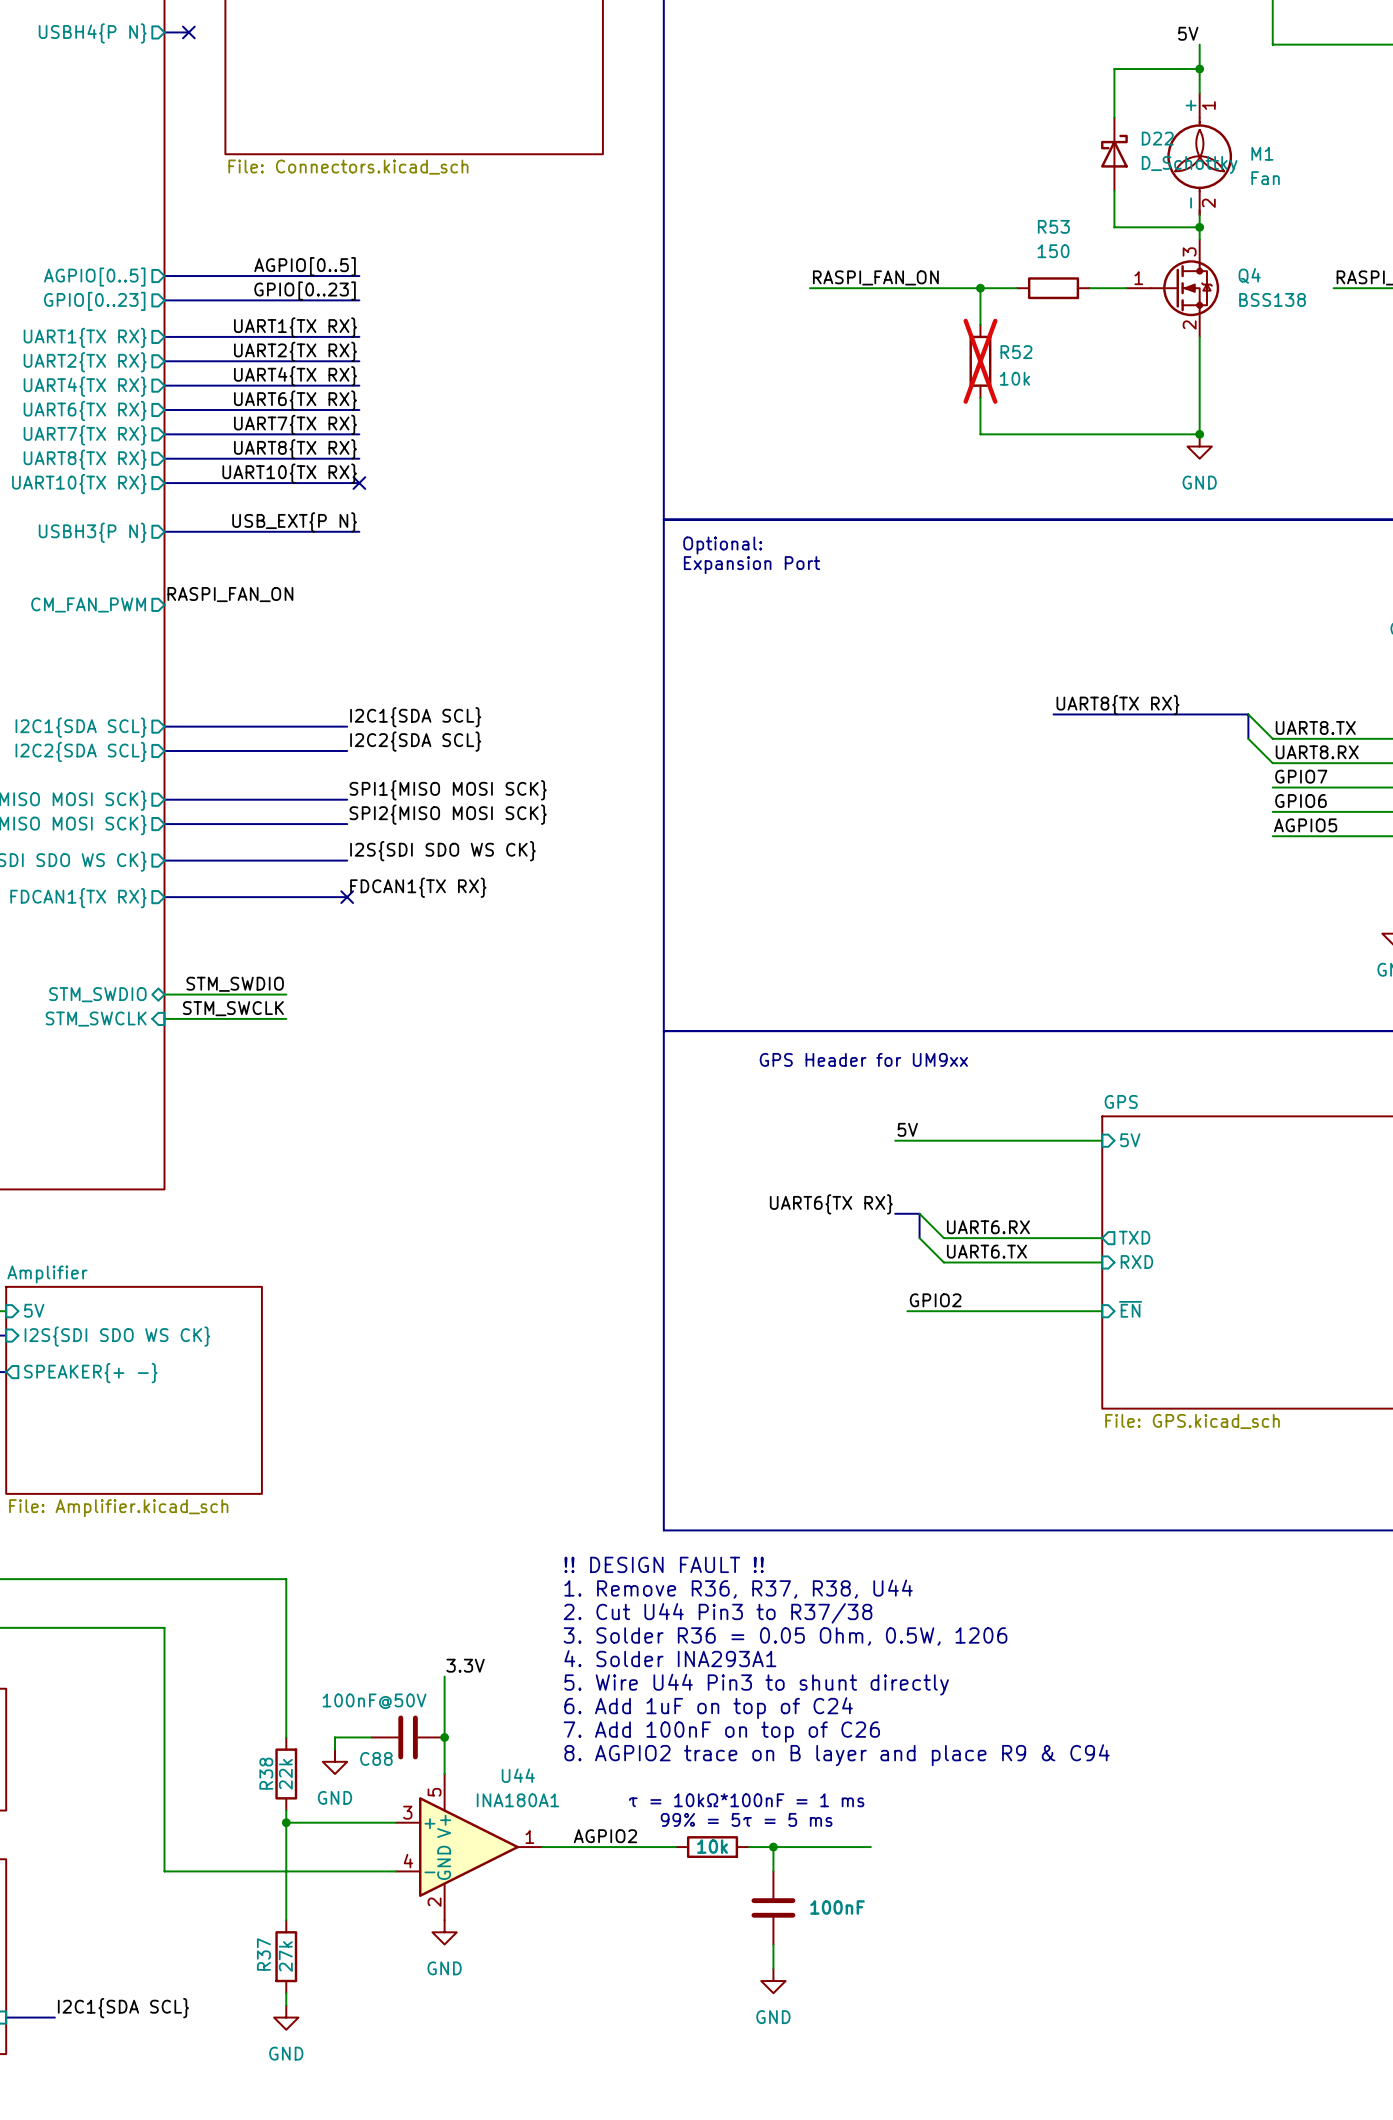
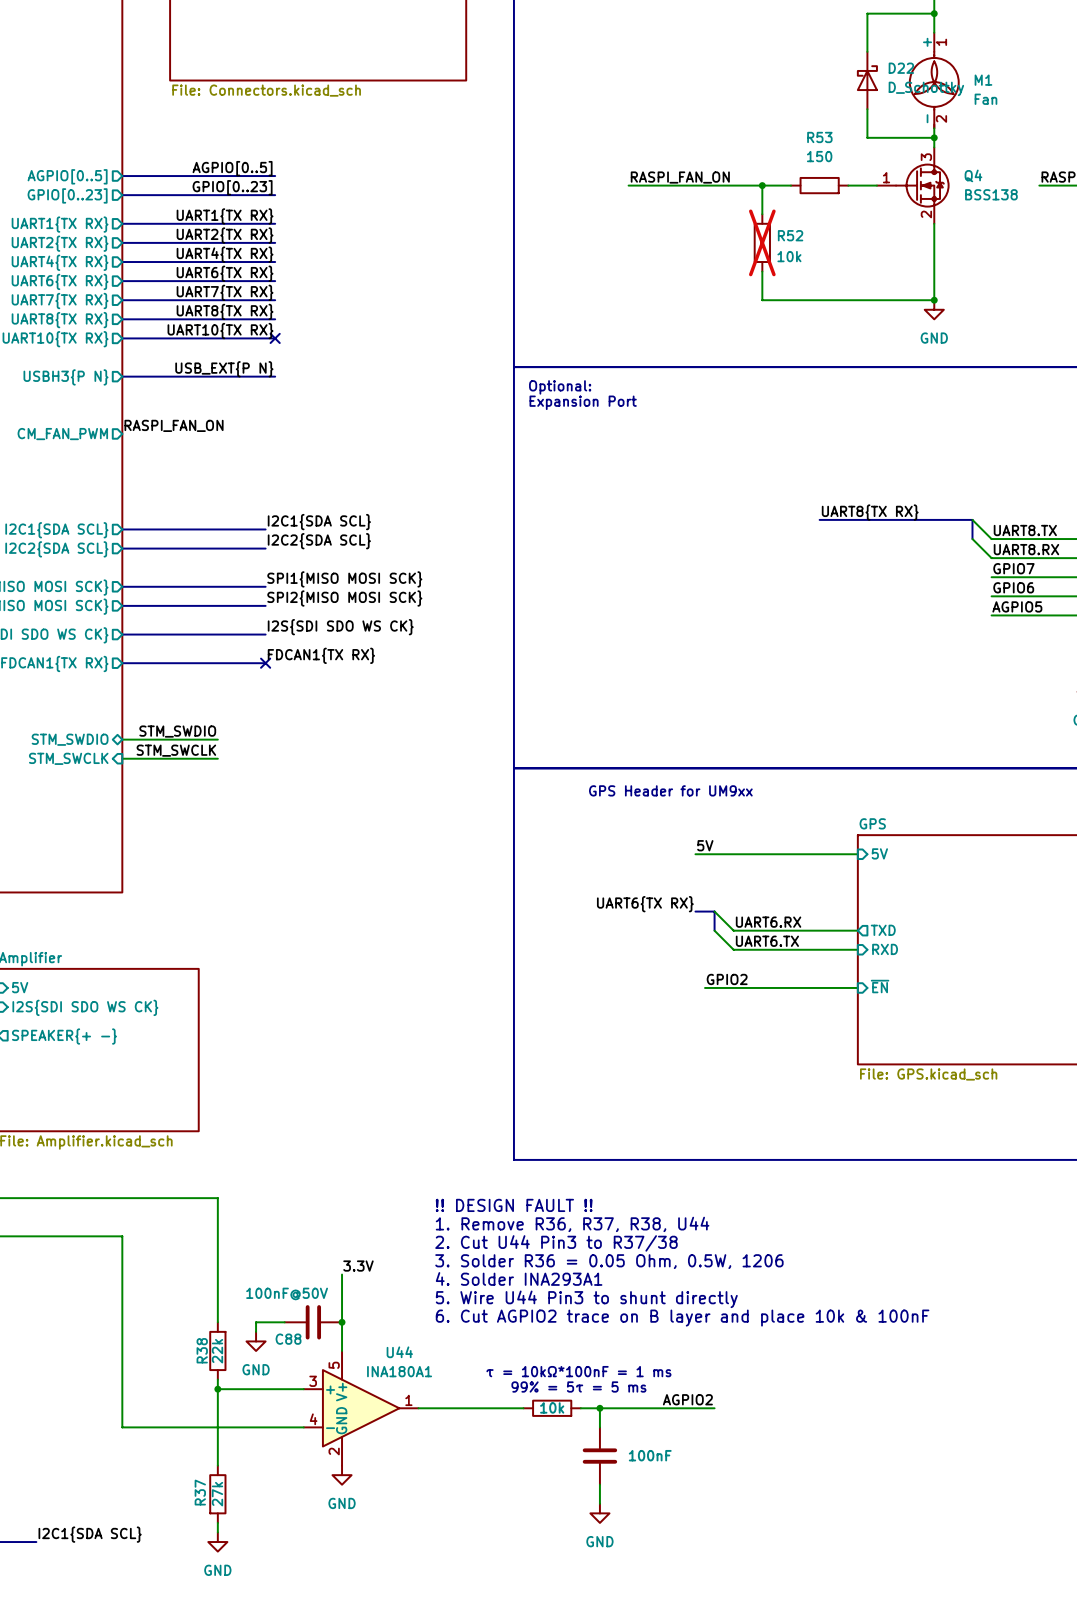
text: !! DESIGN FAULT !! (664, 1564) -> none
text: 1. Remove R36, R37, R38, U44 (738, 1589) -> !! DESIGN FAULT !! (514, 1205)
text: 2. Cut U44 Pin3 to R37/38 (718, 1613) -> 1. Remove R36, R37, R38, U44 (572, 1224)
text: 3. Solder R36 = 0.05 Ohm, 0.5W, 1206 (785, 1636) -> 2. Cut U44 Pin3 to R37/38 (556, 1243)
text: 4. Solder INA293A1 (670, 1658) -> 3. Solder R36 = 0.05 Ohm, 0.5W, 1206 (609, 1261)
text: 5. Wire U44 Pin3 to shunt directly (756, 1684) -> 4. Solder INA293A1 (519, 1278)
text: 6. Add 1uF on top of C24 (708, 1708) -> 5. Wire U44 Pin3 to shunt directly (586, 1299)
text: 7. Add 100nF on top of C26 (721, 1732) -> 6. Cut AGPIO2 trace on B layer and place 10k & 100nF (682, 1318)
text: 8. AGPIO2 trace on B layer and place R9 & C94 (837, 1755) -> none
label: AGPIO2 (605, 1836) -> none
label: none -> AGPIO2 (687, 1399)
wire: none -> (676, 1408) (714, 1408)

